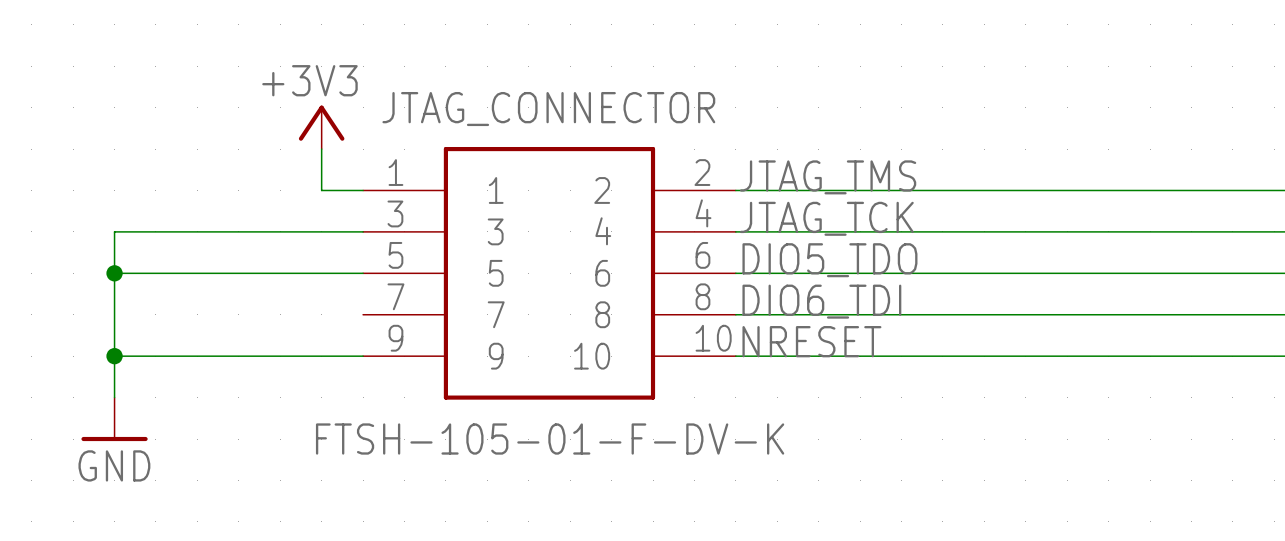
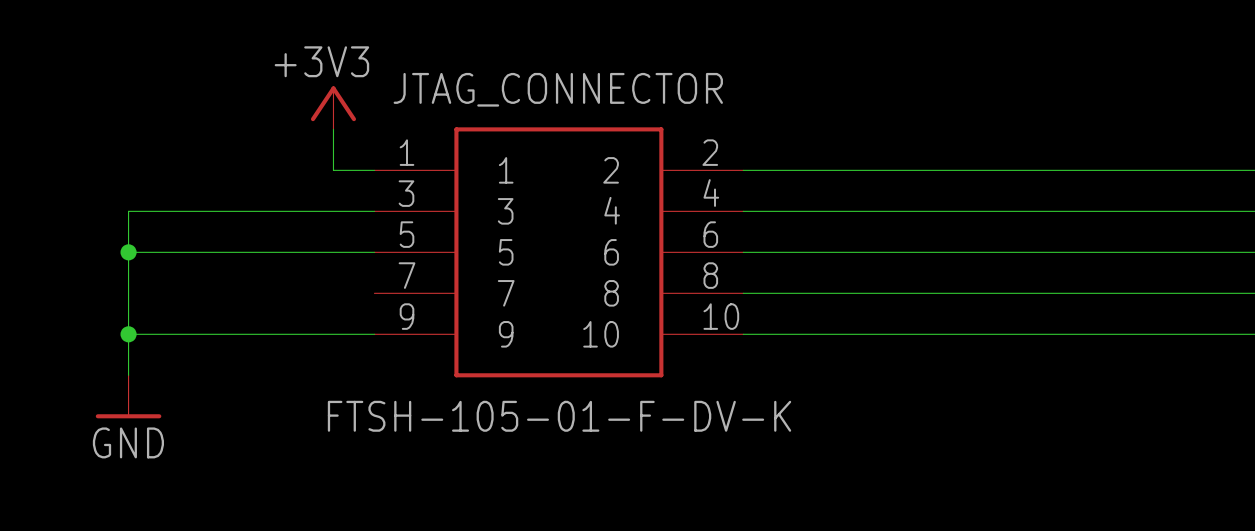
label: JTAG_TMS (828, 177) -> none
label: JTAG_TCK (826, 218) -> none
label: DIO5_TDO (829, 260) -> none
label: DIO6_TDI (821, 301) -> none
label: NRESET (811, 341) -> none

